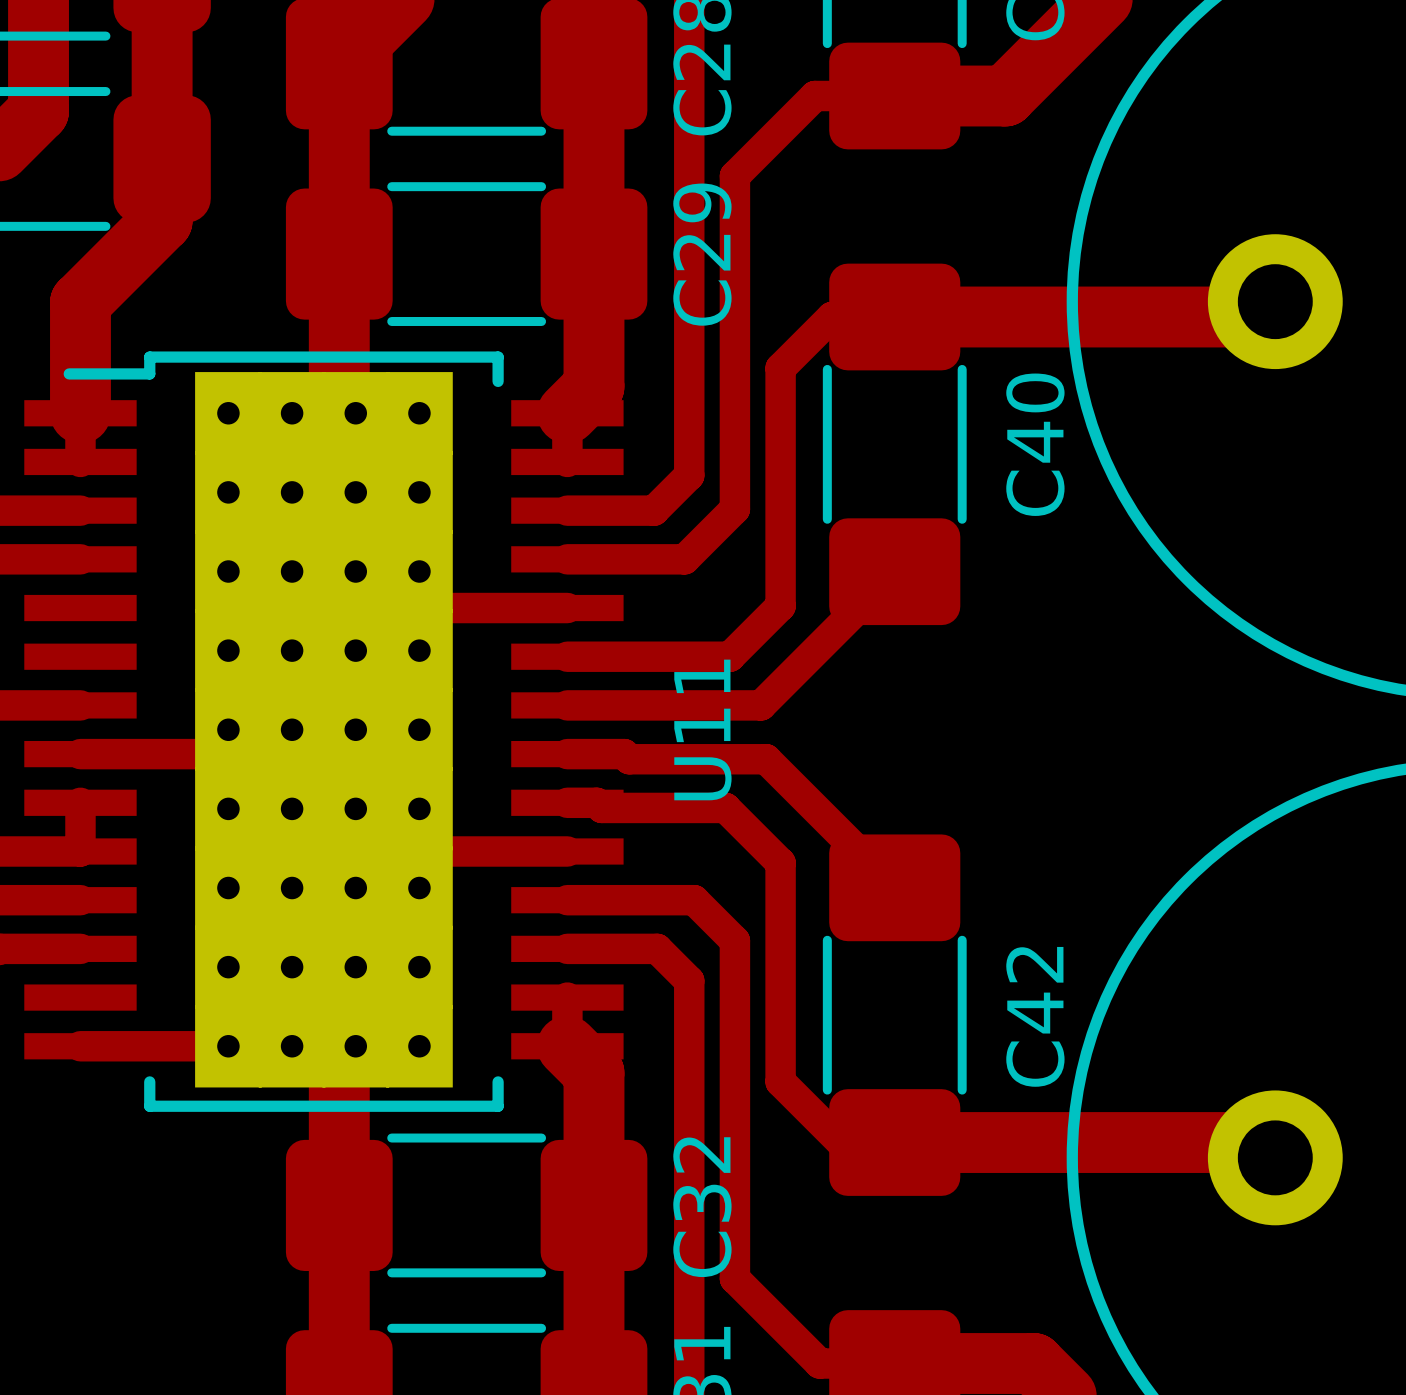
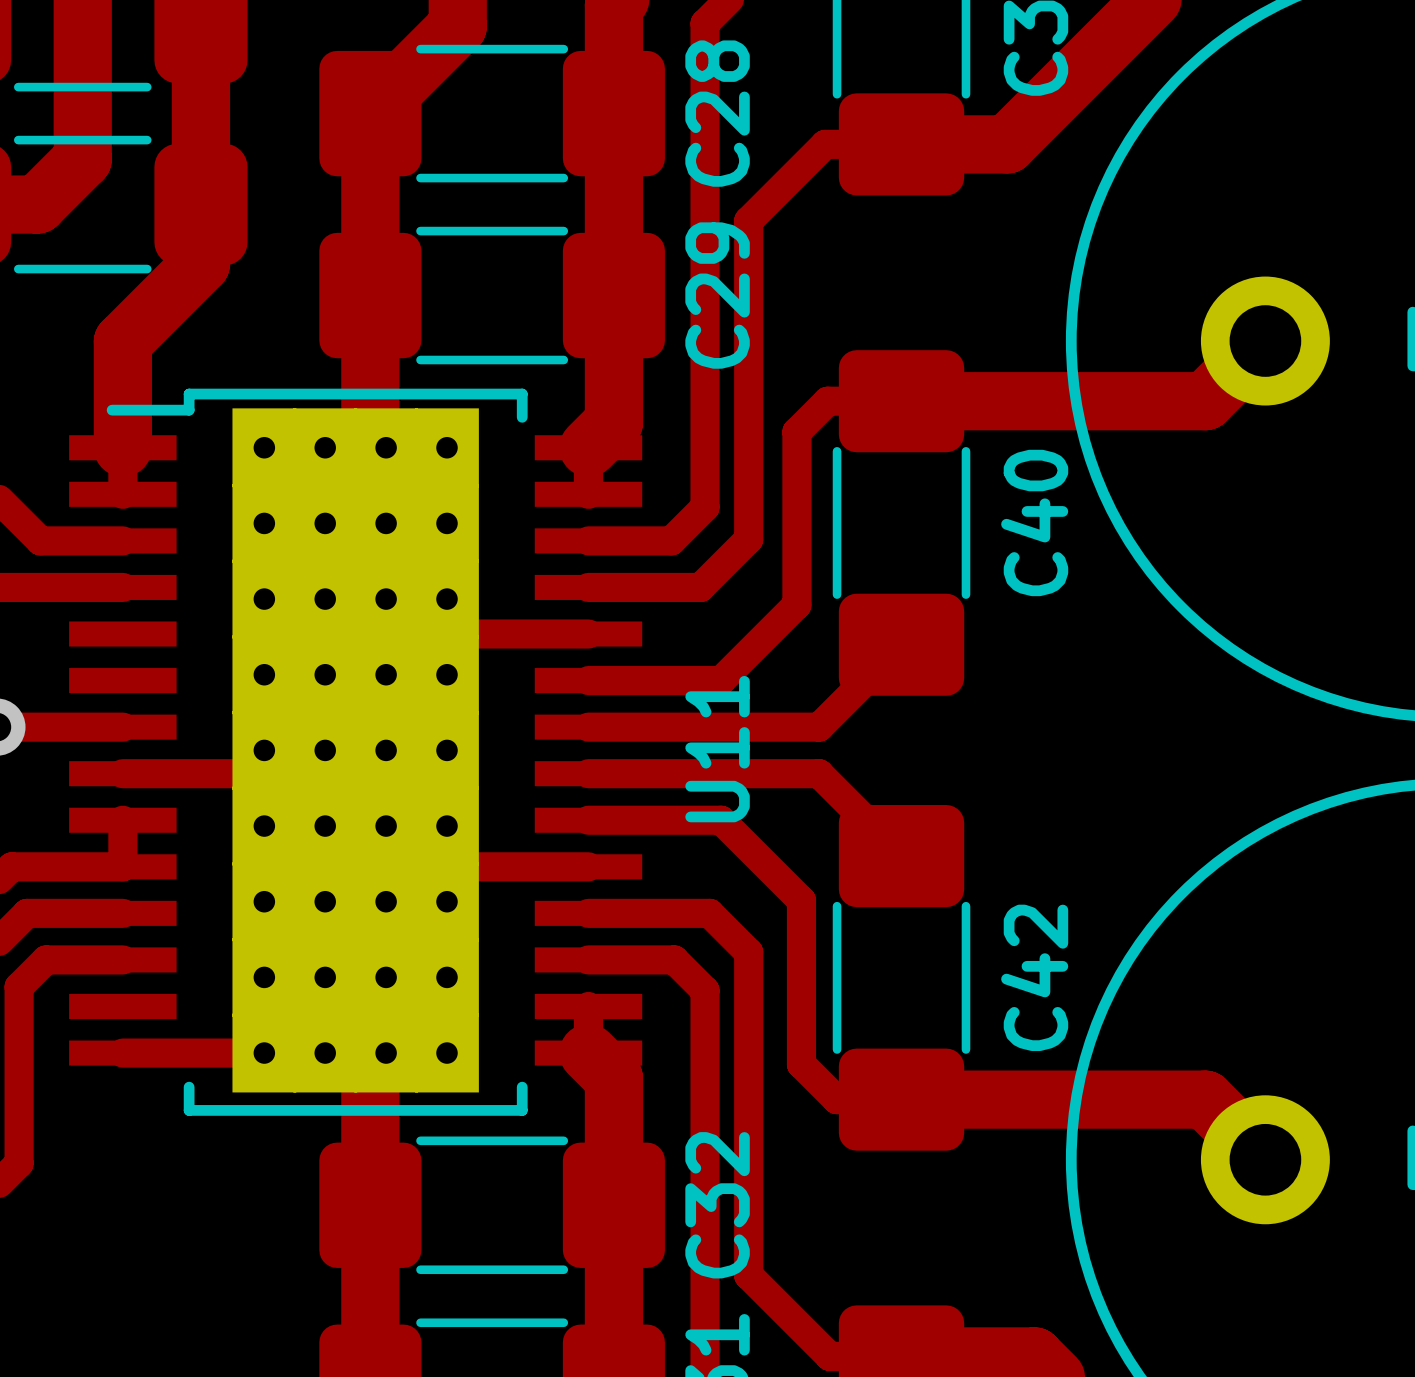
track: (1259, 317) (831, 317) (780, 368) (780, 606) (729, 656) (706, 656) -> (1250, 355) (1205, 401) (827, 401) (796, 431) (796, 604) (721, 680)
C40 position: (894, 444) -> (901, 522)
track: (894, 571) (761, 705) -> (901, 644) (819, 727) (773, 727)
track: (624, 754) (629, 759) (766, 759) (894, 887) -> (642, 773) (819, 773) (901, 856)
track: (596, 802) (601, 807) (725, 807) (780, 862) (780, 1081) (841, 1142) (1259, 1142) -> (616, 820) (721, 820) (801, 900) (801, 1064) (836, 1099) (1205, 1099) (1250, 1145)
C42 position: (894, 1015) -> (901, 977)

